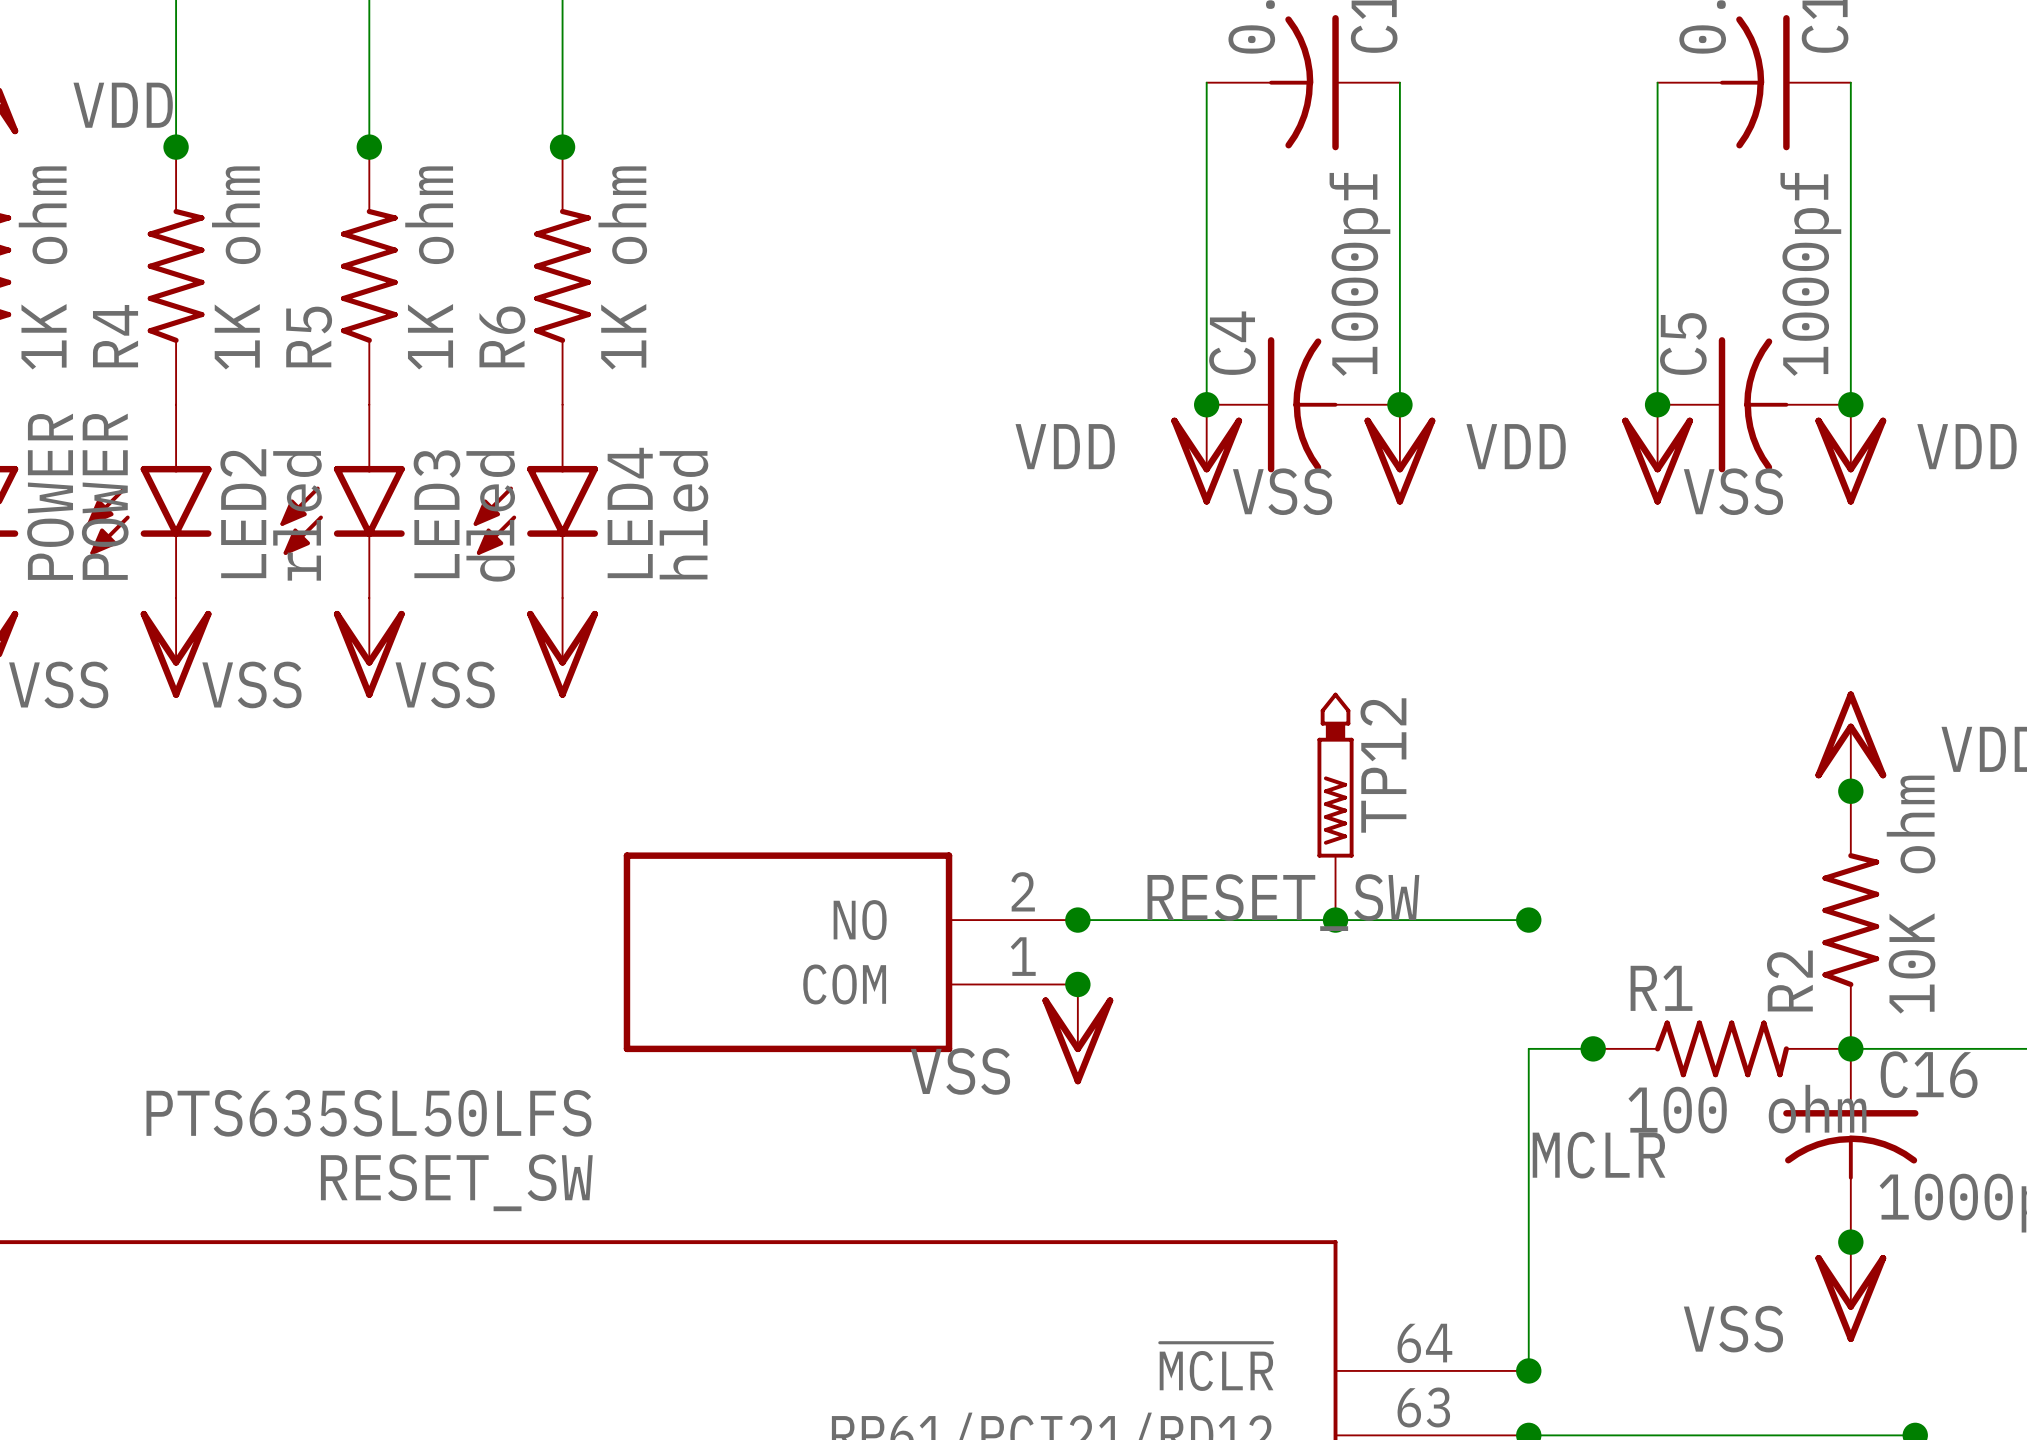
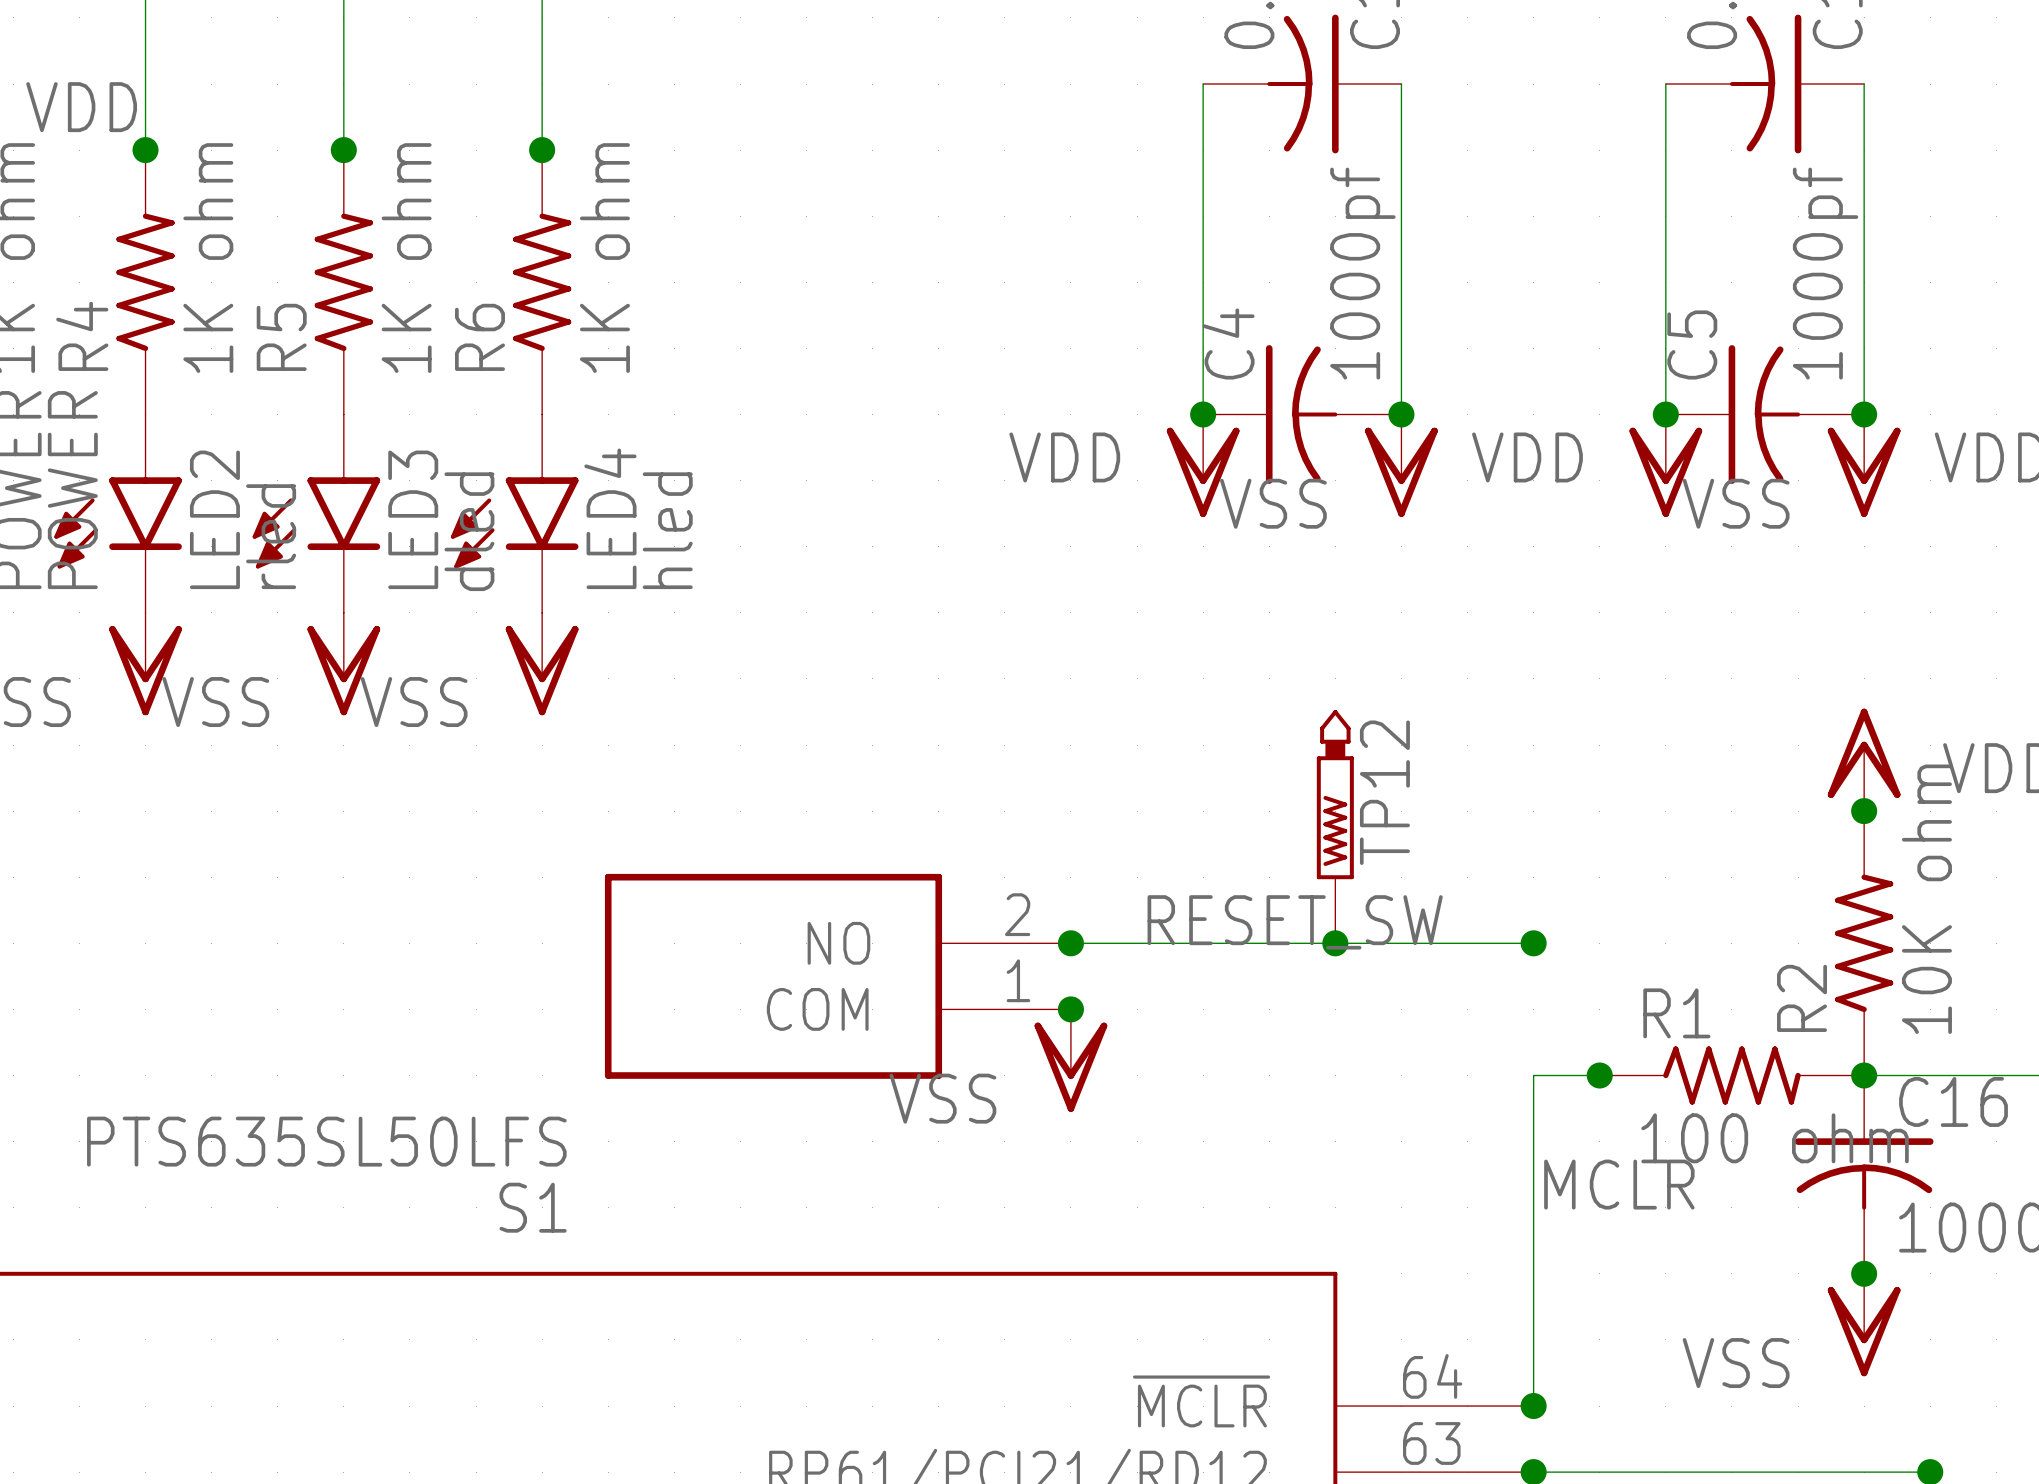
RESET_SW name: RESET_SW (456, 1182) -> S1 (533, 1207)

